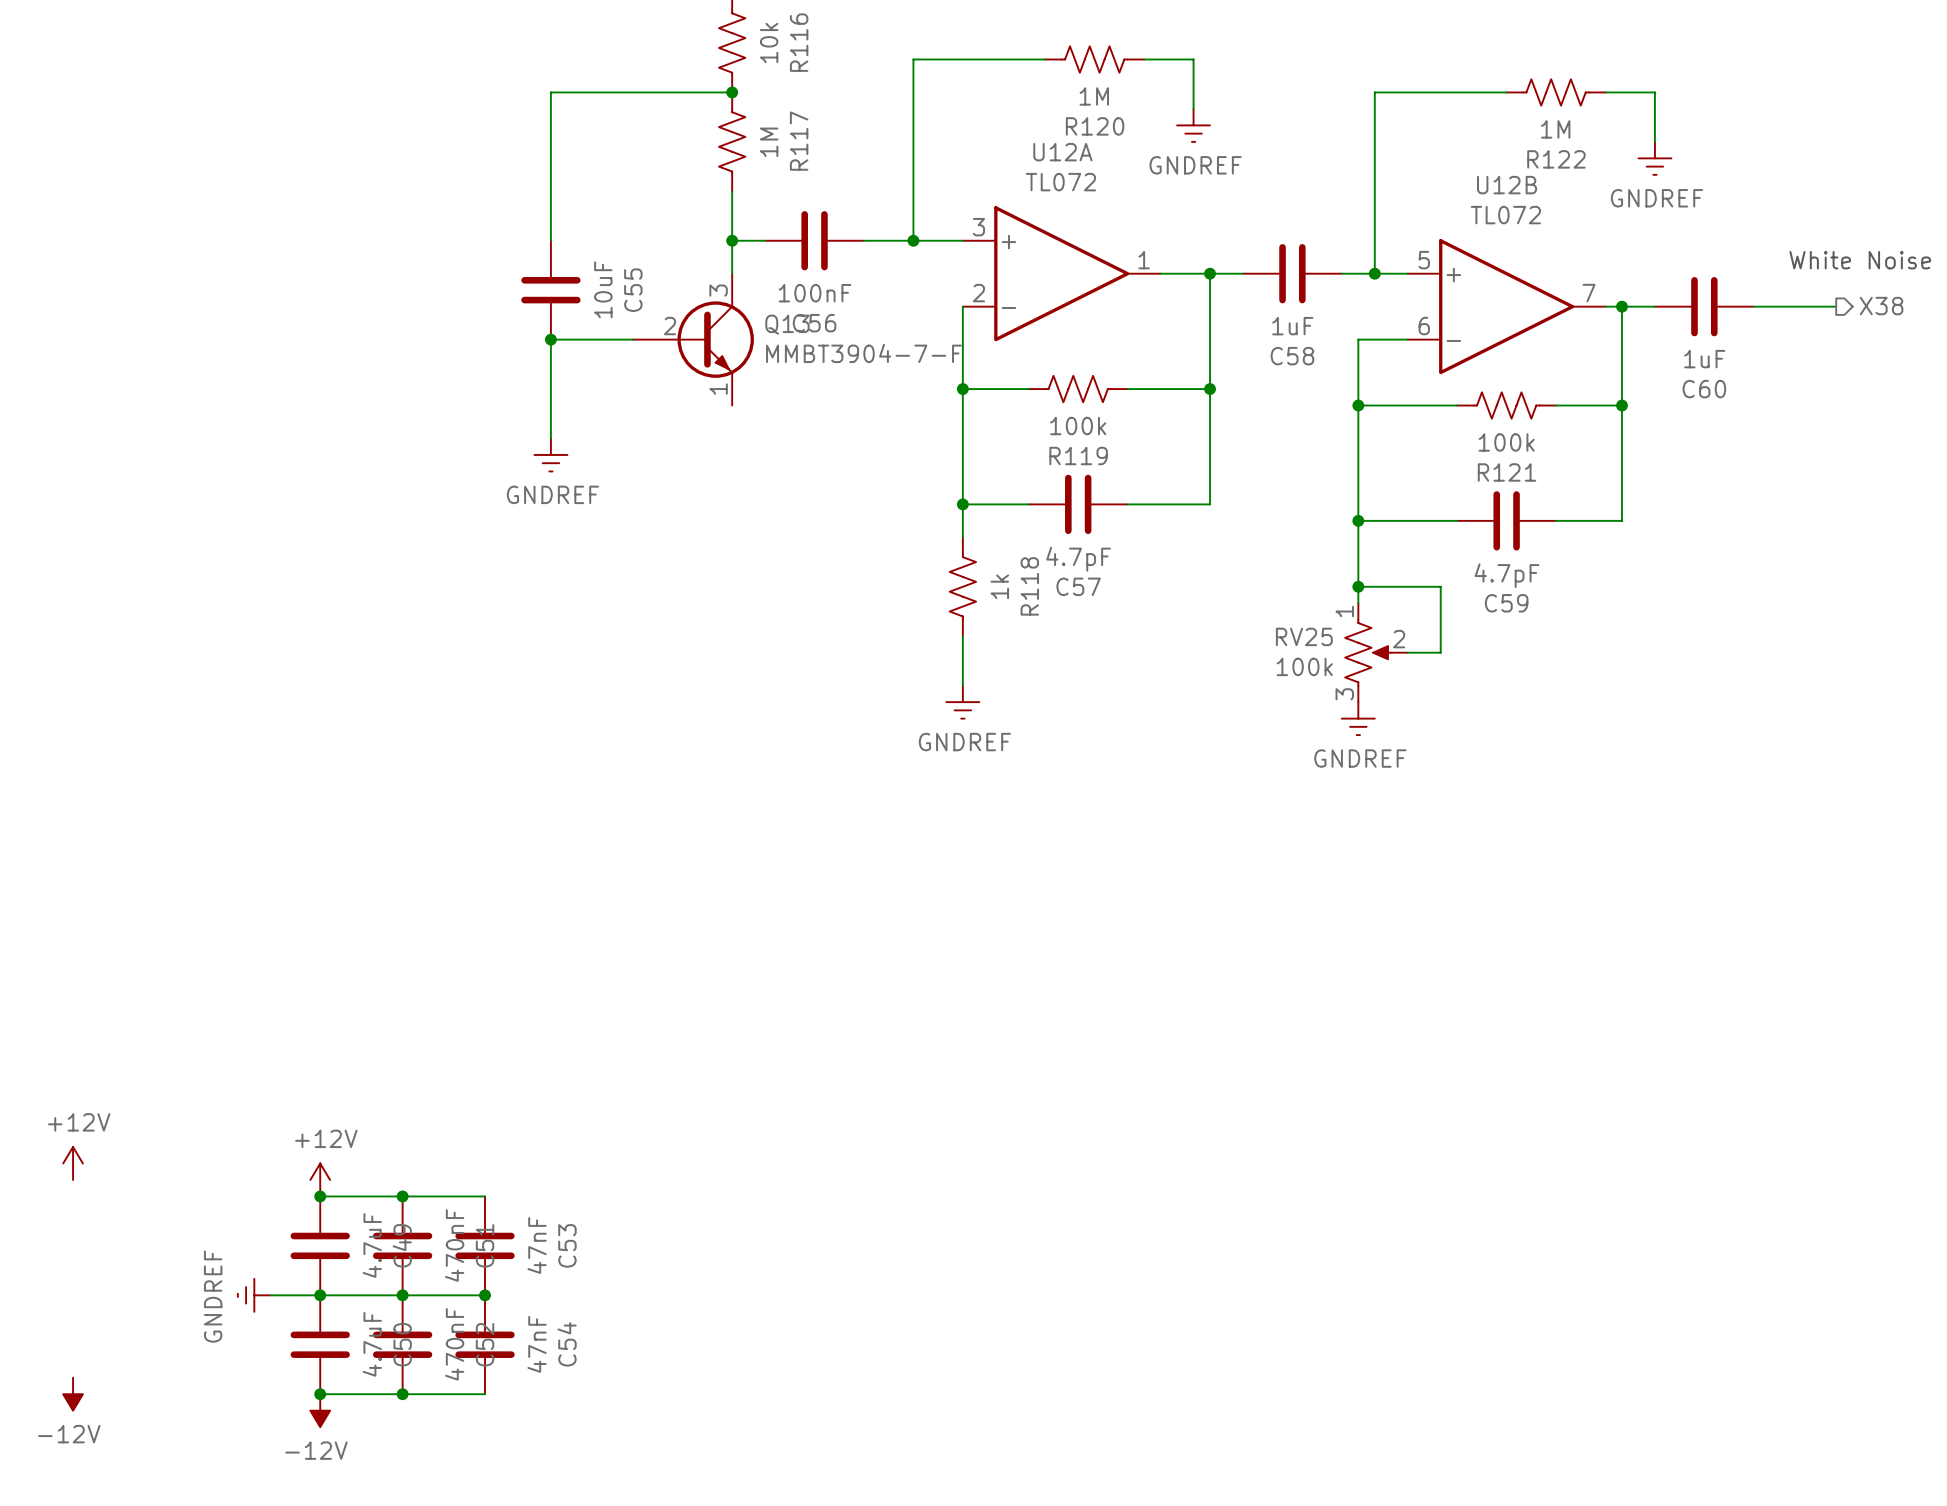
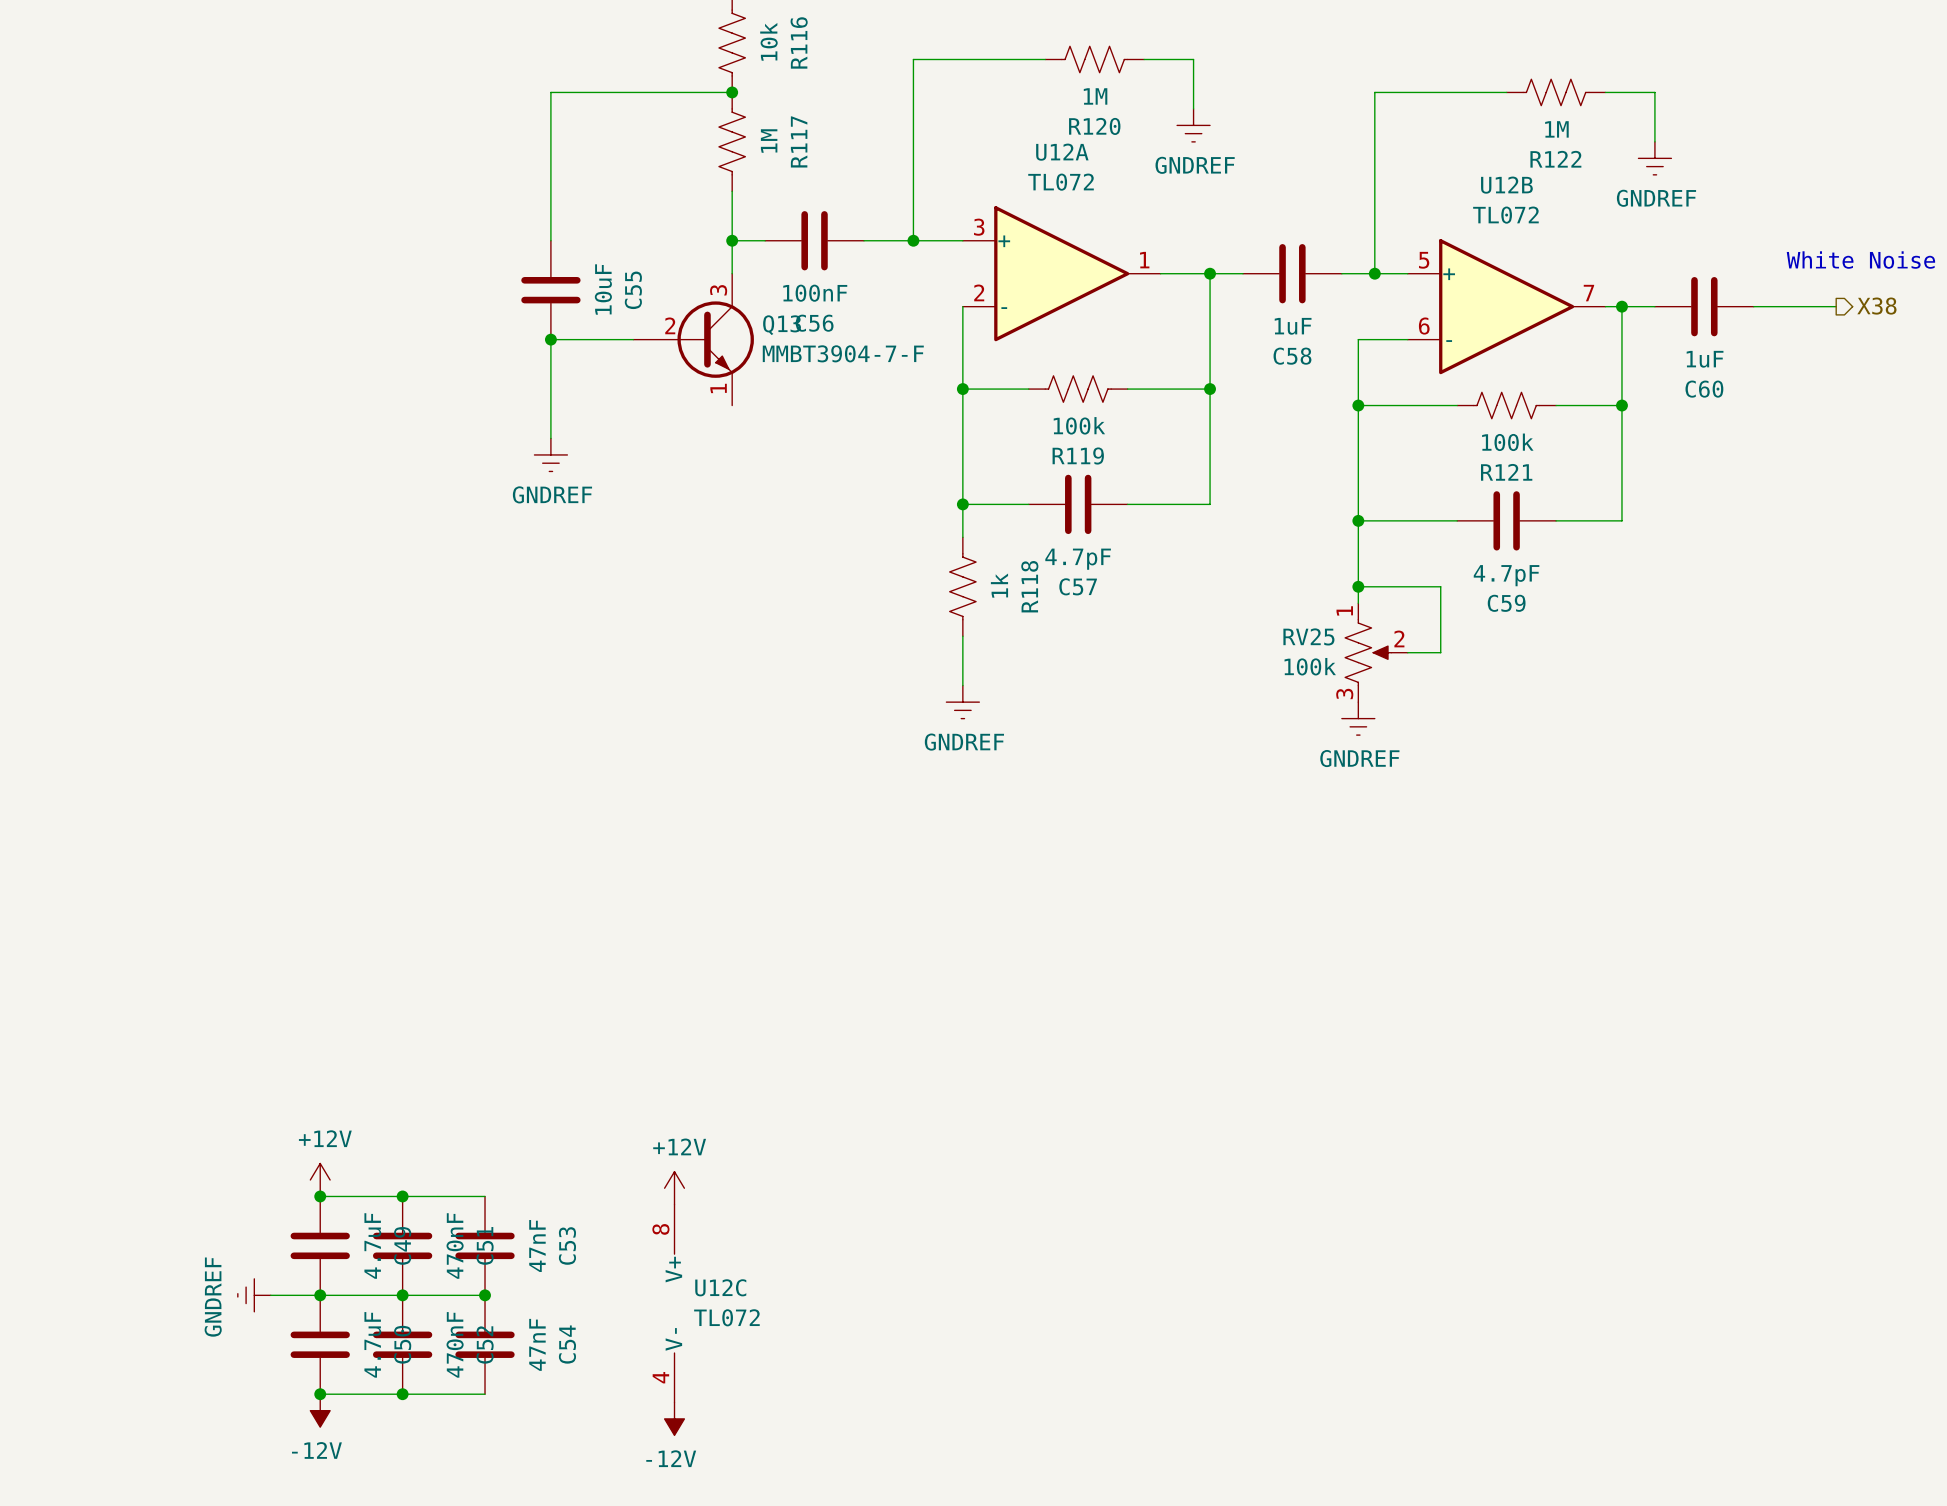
power symbol: +12V (73, 1163) -> none
power symbol: none -> +12V (674, 1188)
U12C: none -> TL072 (674, 1303)
power symbol: -12V (73, 1394) -> none
power symbol: none -> -12V (674, 1418)

